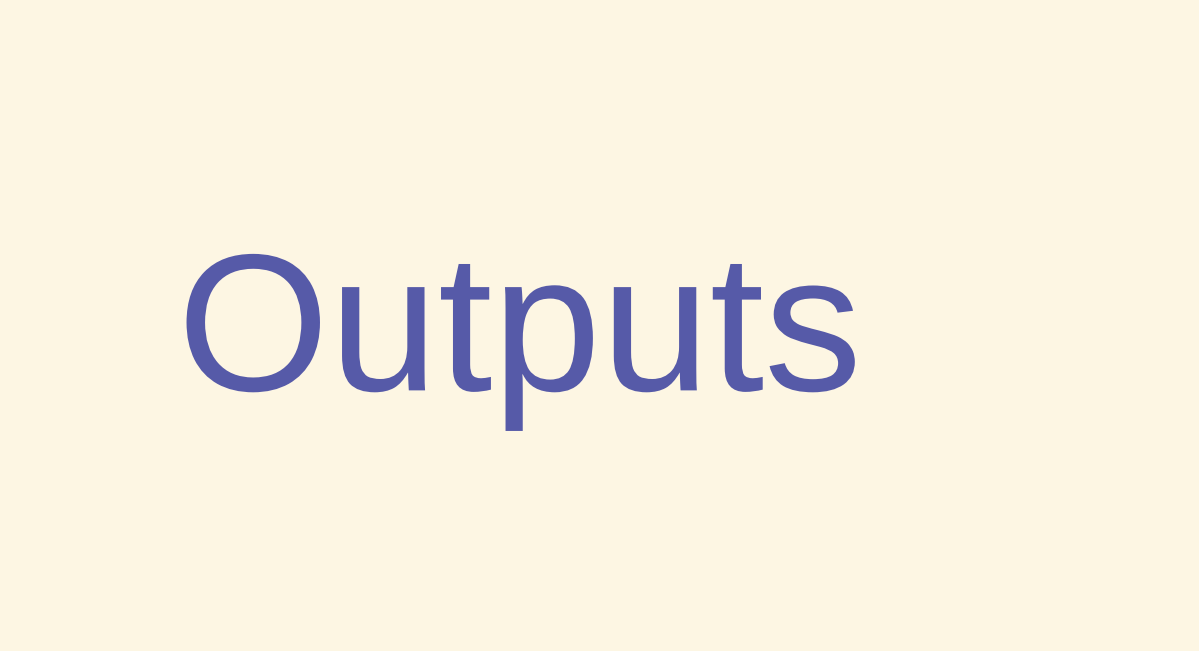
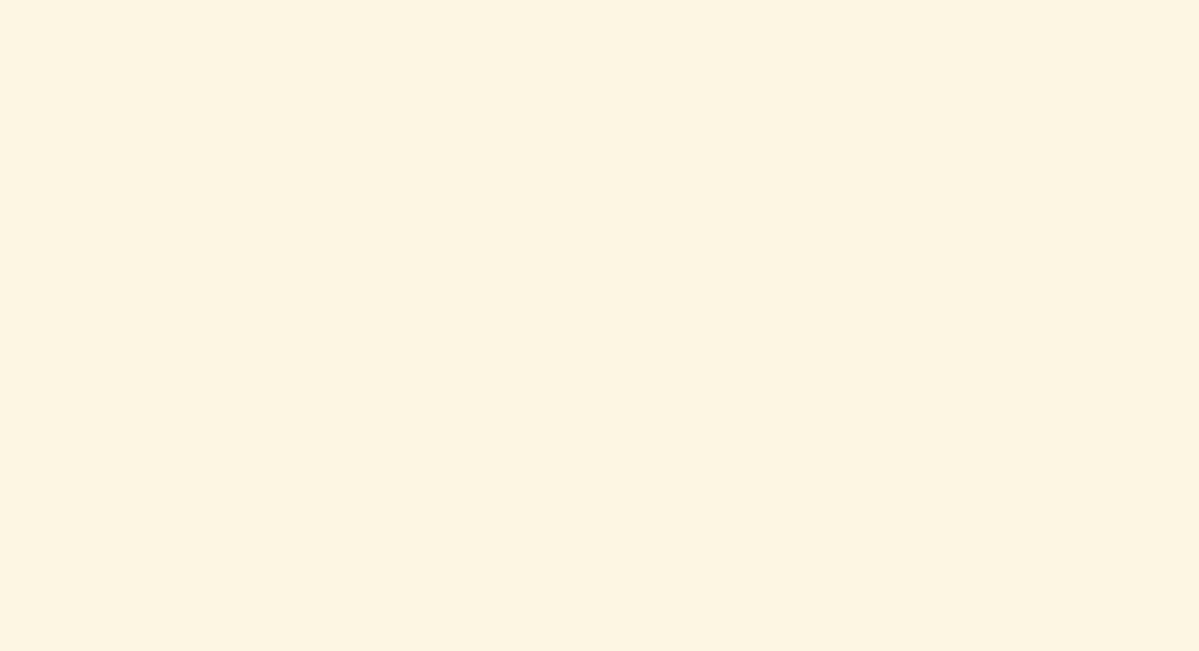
text: Outputs (520, 342) -> none

